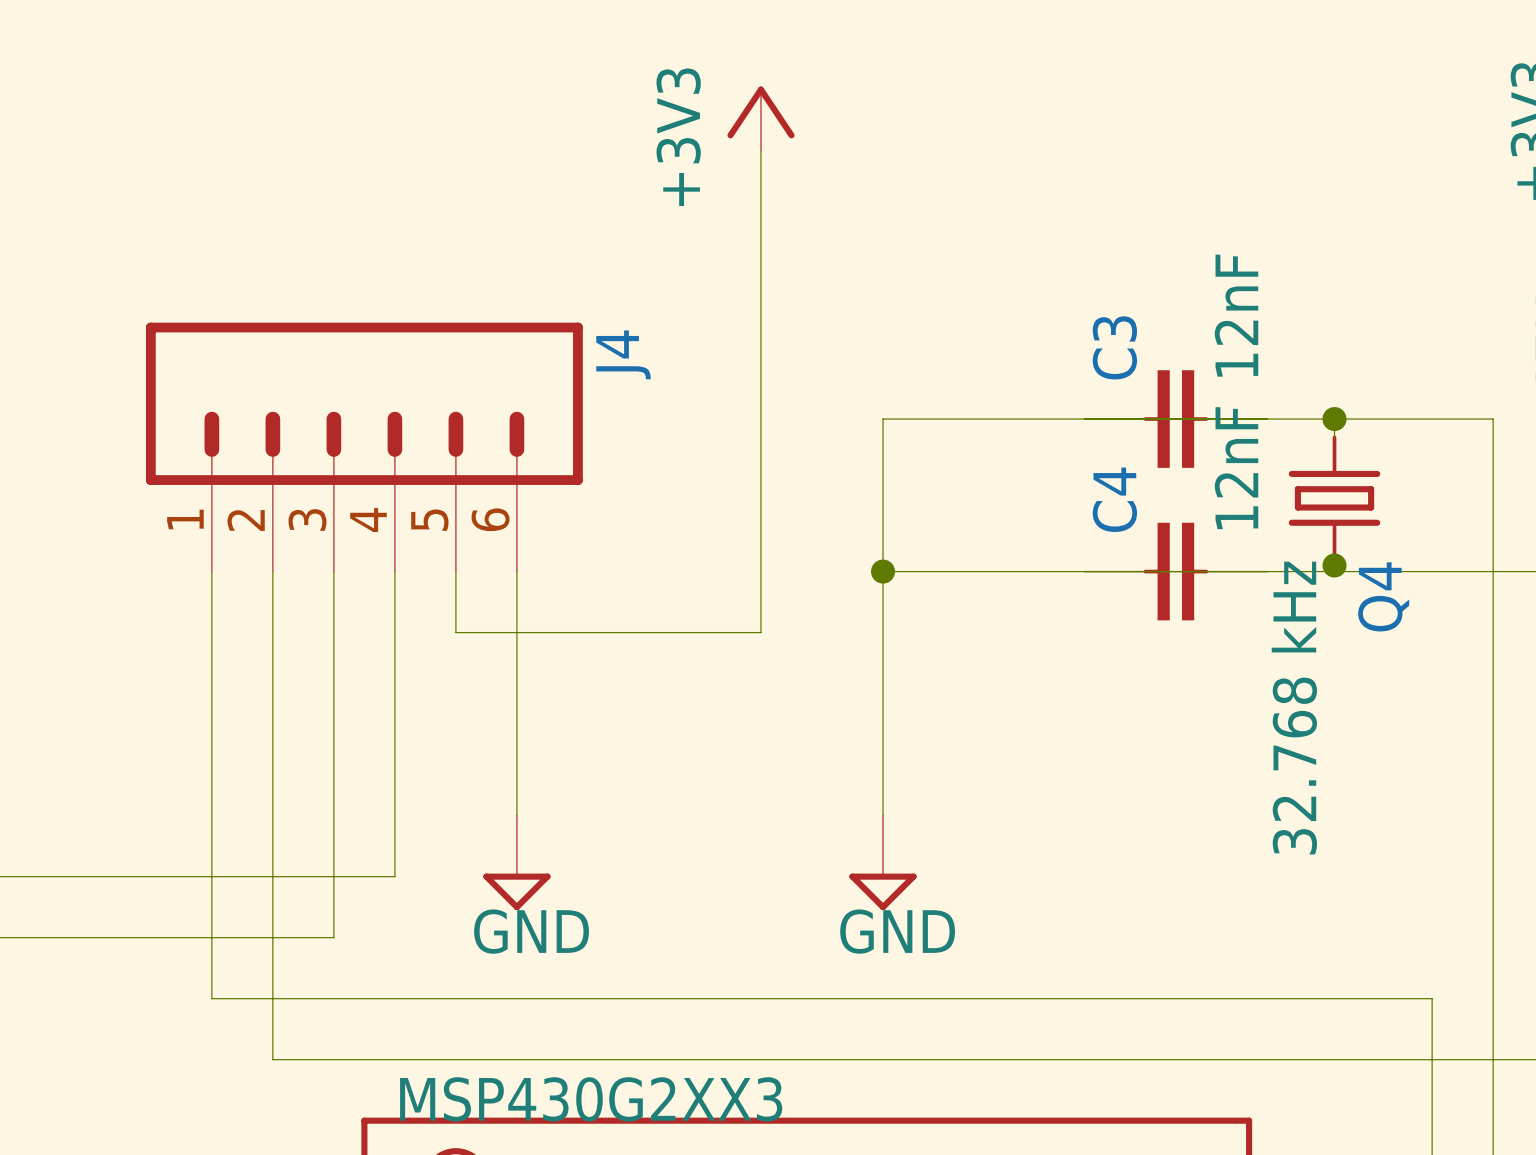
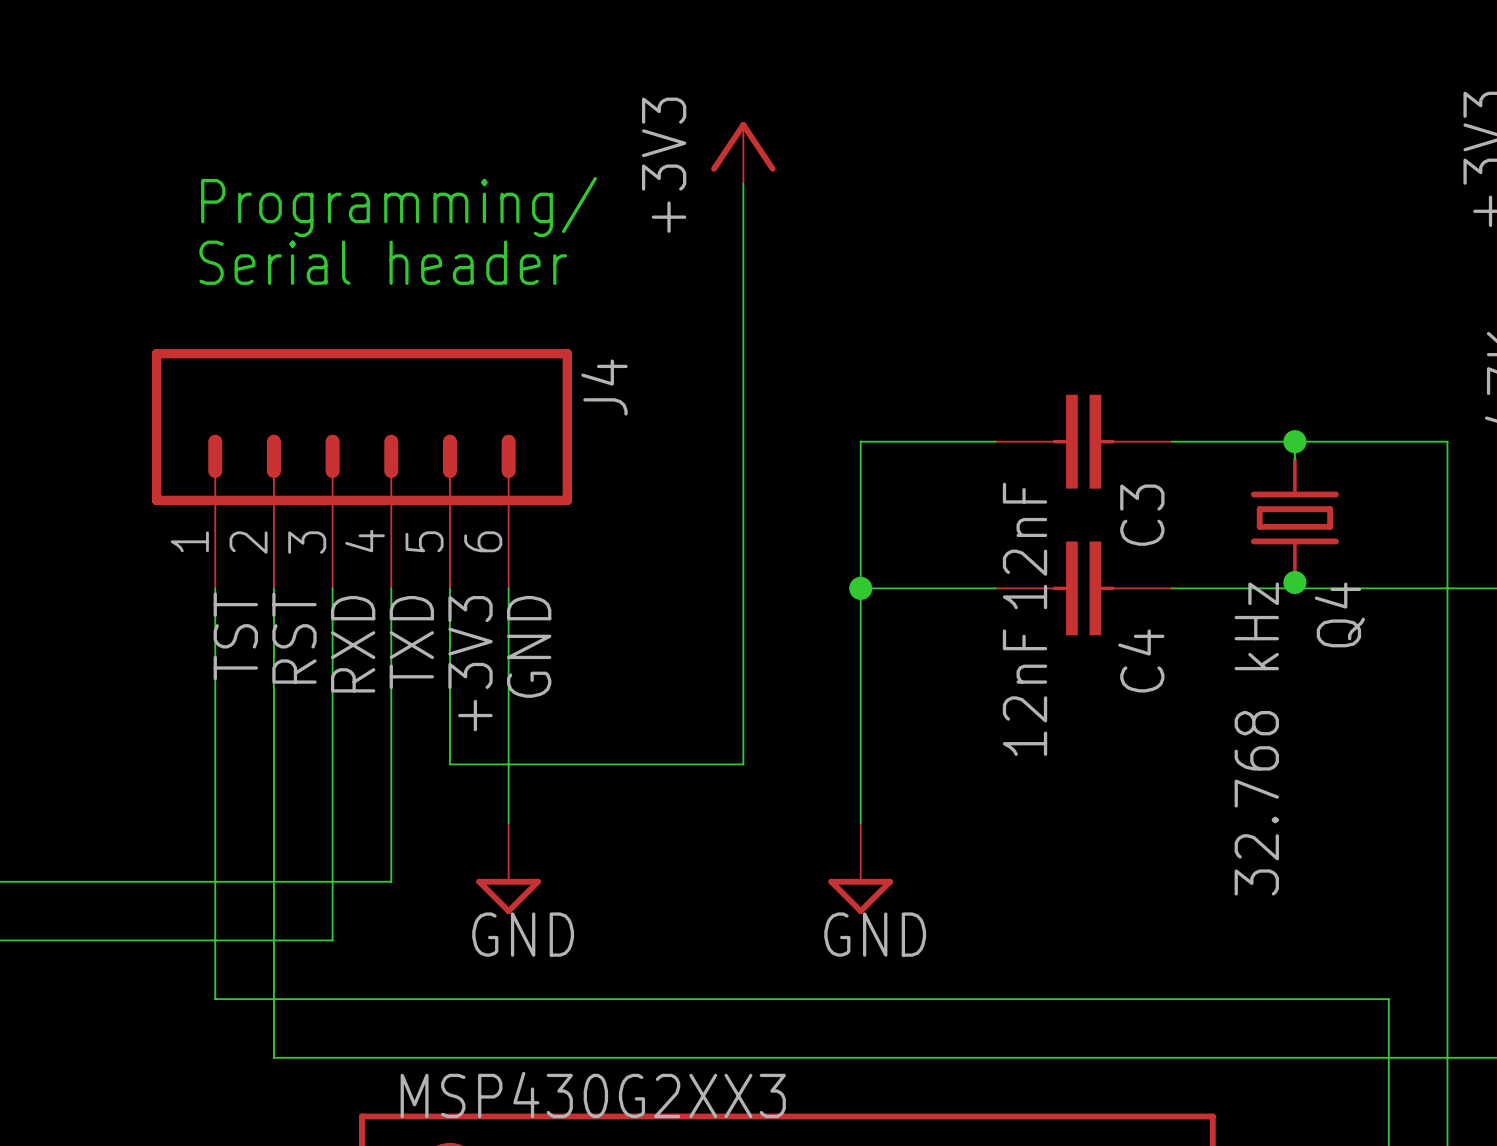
text: none -> Programming/ (399, 206)
text: none -> Serial header (383, 262)
C3 value position: 12nF (1236, 315) -> 12nF (1025, 545)
C3 name position: C3 (1114, 347) -> C3 (1142, 515)
C3 position: (1175, 419) -> (1083, 441)
C4 value position: 12nF (1236, 468) -> 12nF (1025, 692)
C4 name position: C4 (1114, 499) -> C4 (1141, 660)
C4 position: (1175, 571) -> (1083, 588)
label: none -> TST (235, 636)
label: none -> RST (294, 638)
label: none -> RXD (353, 644)
label: none -> TXD (411, 642)
wire: (455, 632) (760, 632) -> (449, 647) (449, 764) (743, 764) (743, 647)
label: none -> GND (529, 646)
label: none -> +3V3 (470, 663)

